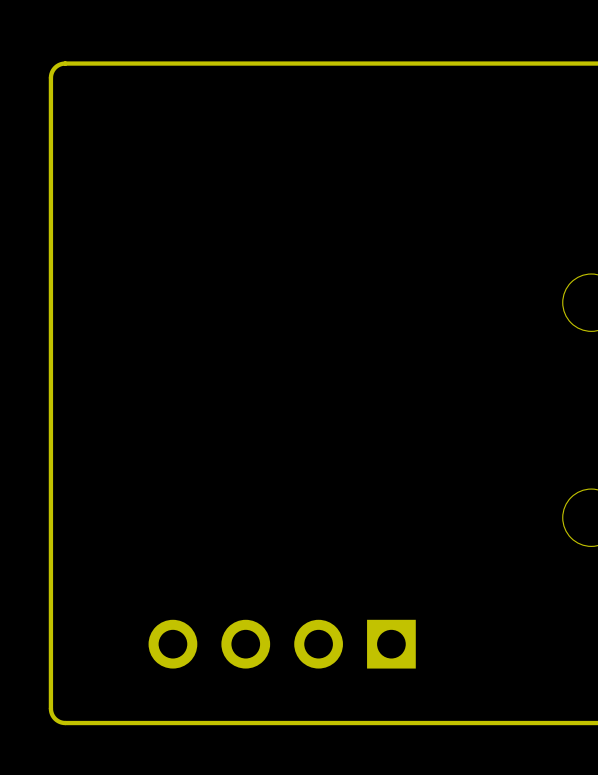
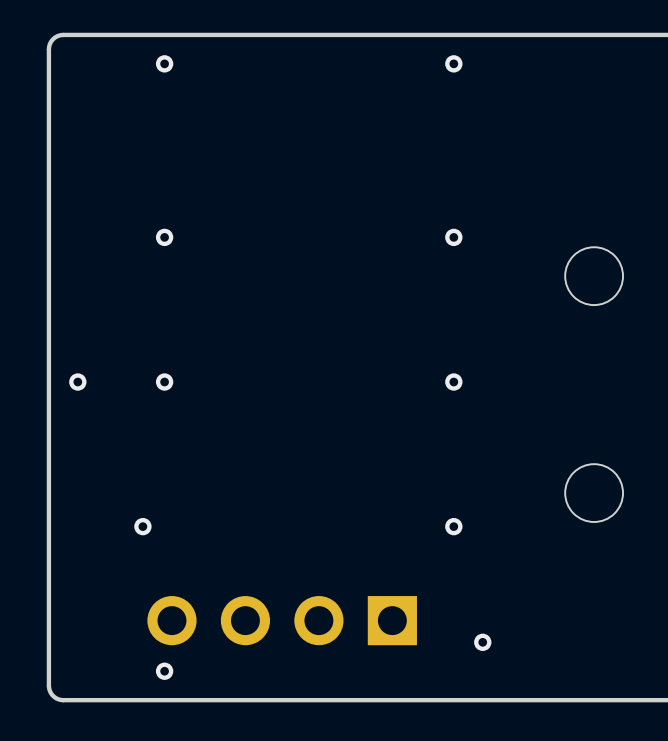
via: none -> (164, 63)
via: none -> (453, 63)
via: none -> (164, 237)
via: none -> (453, 237)
via: none -> (77, 382)
via: none -> (164, 382)
via: none -> (453, 382)
via: none -> (142, 526)
via: none -> (453, 526)
via: none -> (482, 642)
via: none -> (164, 671)

